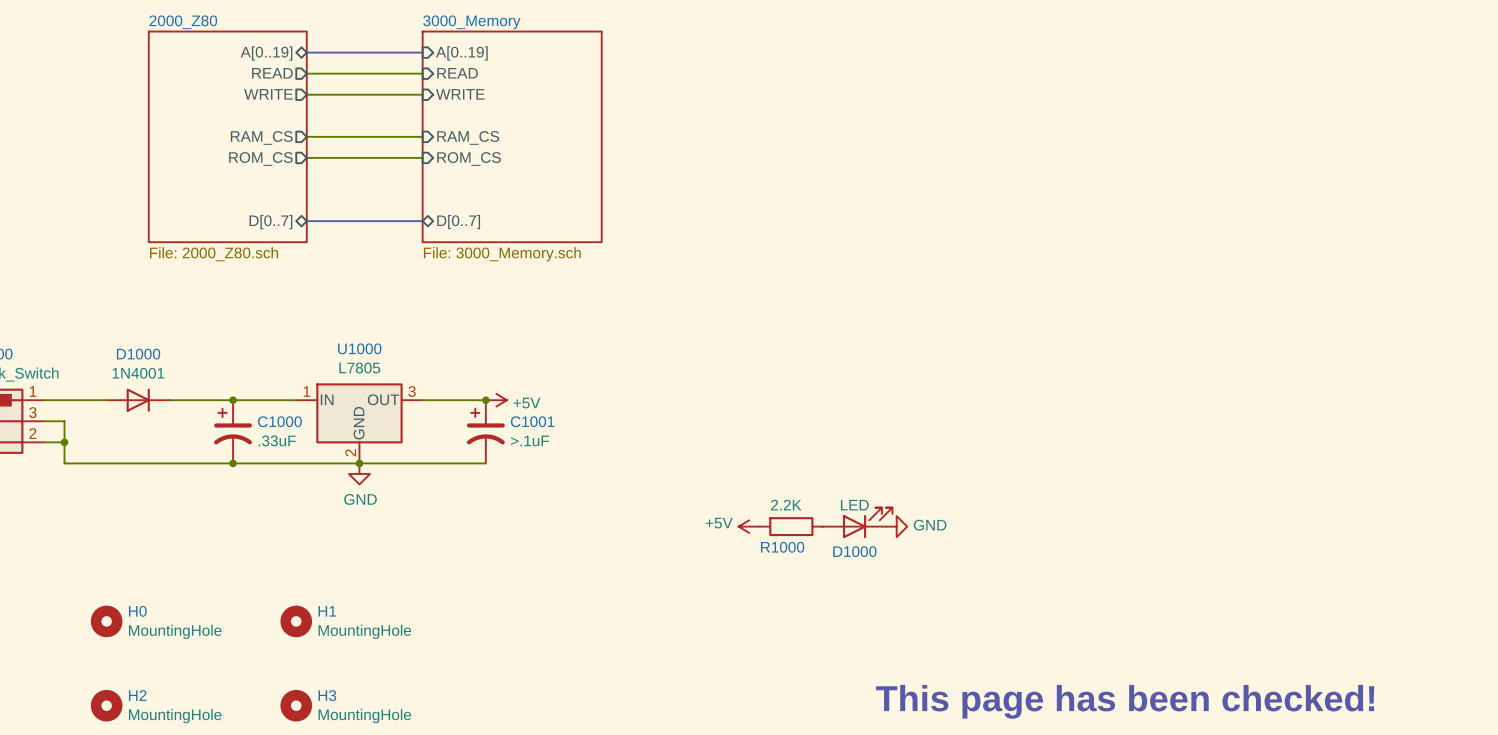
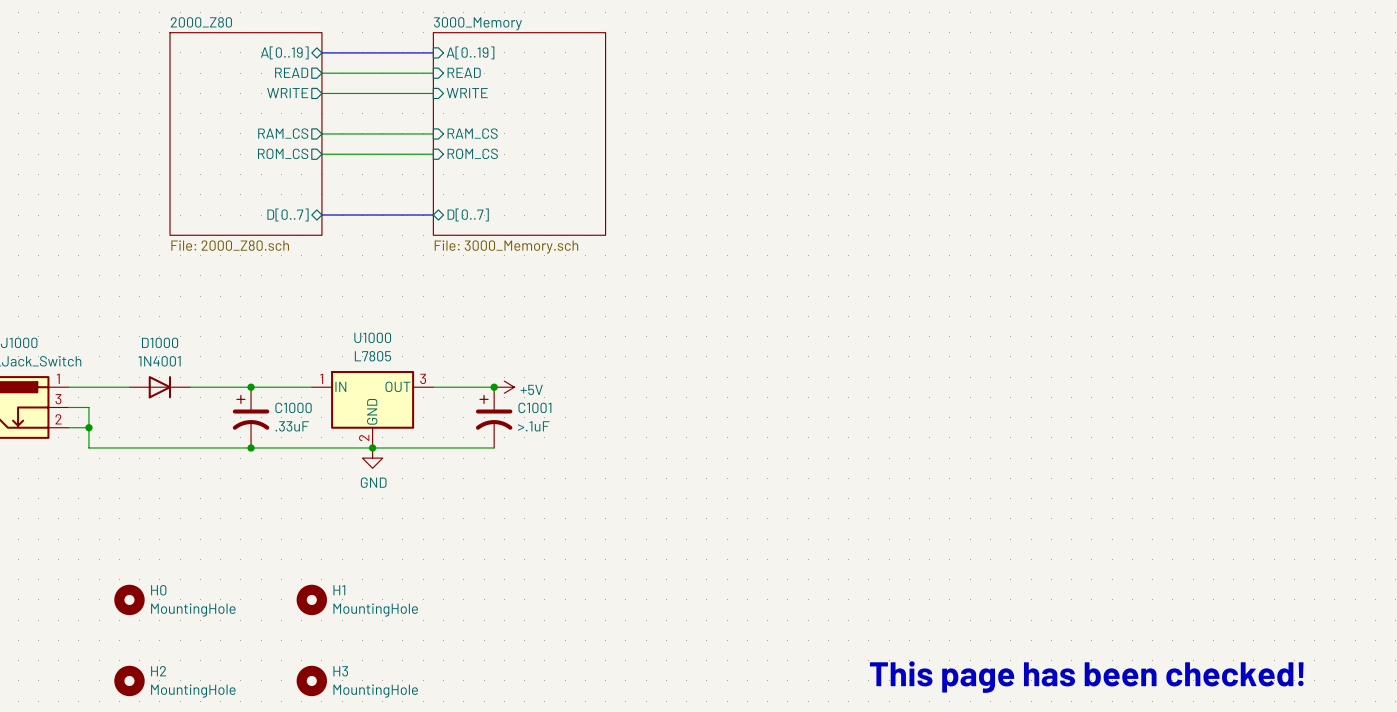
D1000: LED (857, 522) -> none
power symbol: +5V (749, 526) -> none
R1000: 2.2K (791, 526) -> none
power symbol: GND (896, 526) -> none

